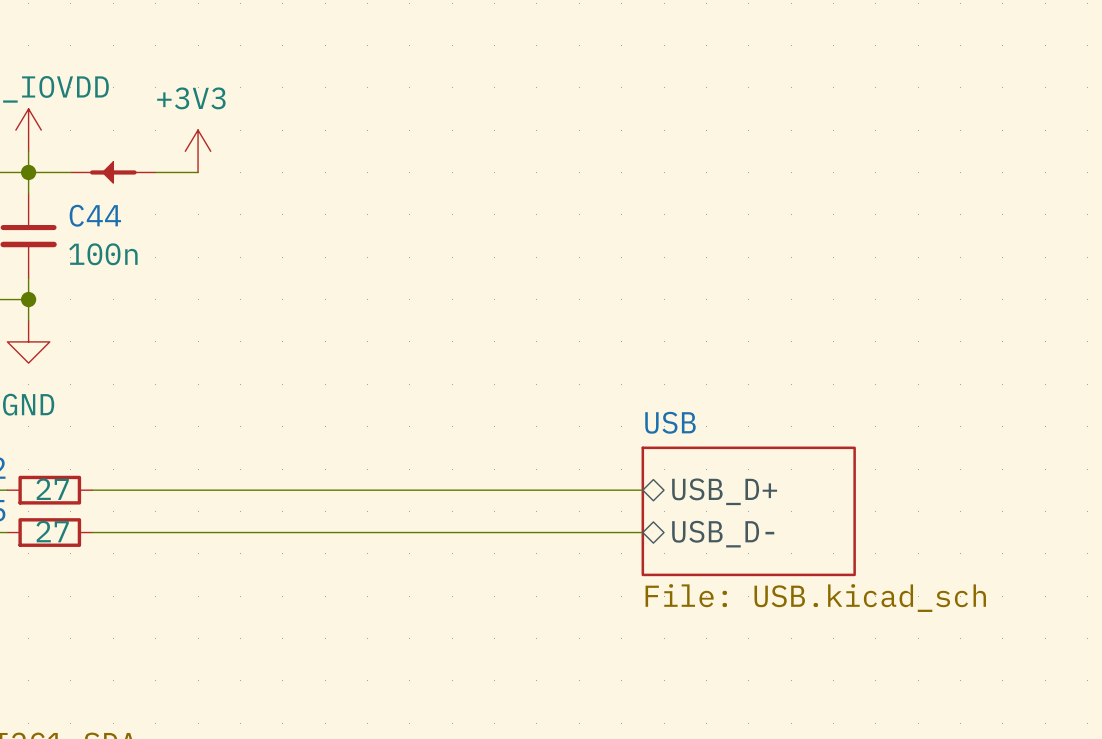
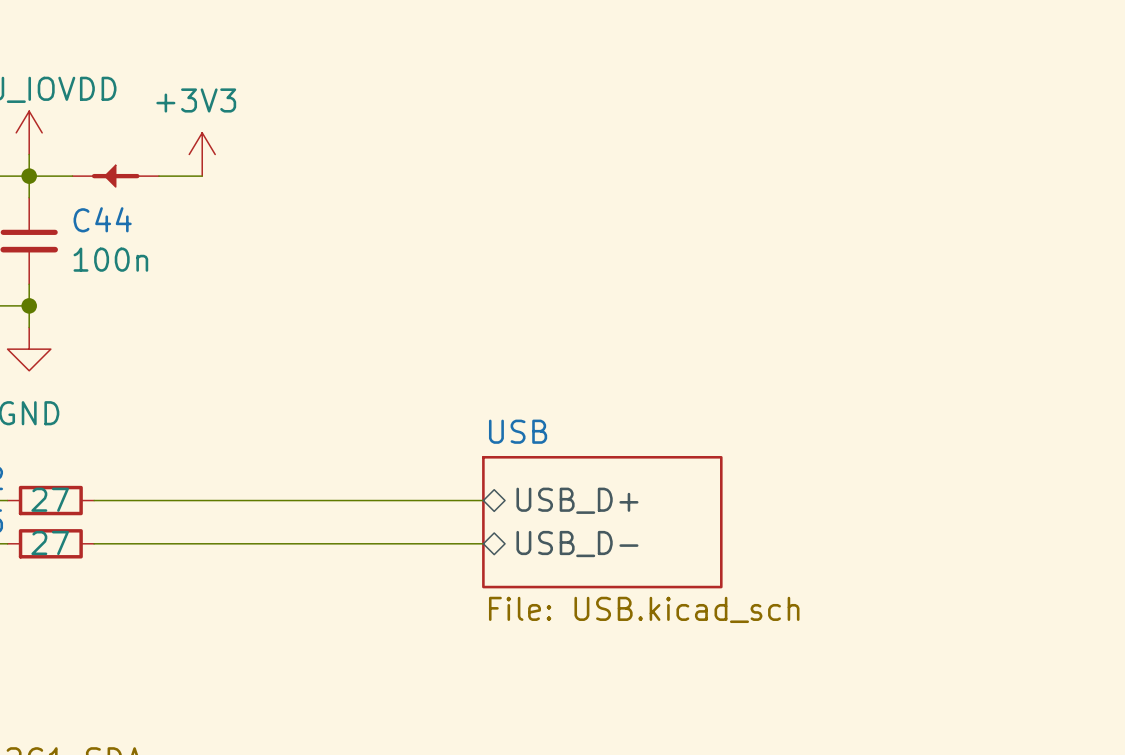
wire: (473, 490) (642, 490) -> none
sheet pin position: USB_D+ (724, 491) -> USB_D+ (577, 500)
sheet USB: none -> File: USB.kicad_sch (602, 522)
sheet USB: File: USB.kicad_sch (748, 511) -> none
wire: (473, 532) (642, 532) -> none
sheet pin position: USB_D- (723, 534) -> USB_D- (577, 544)

